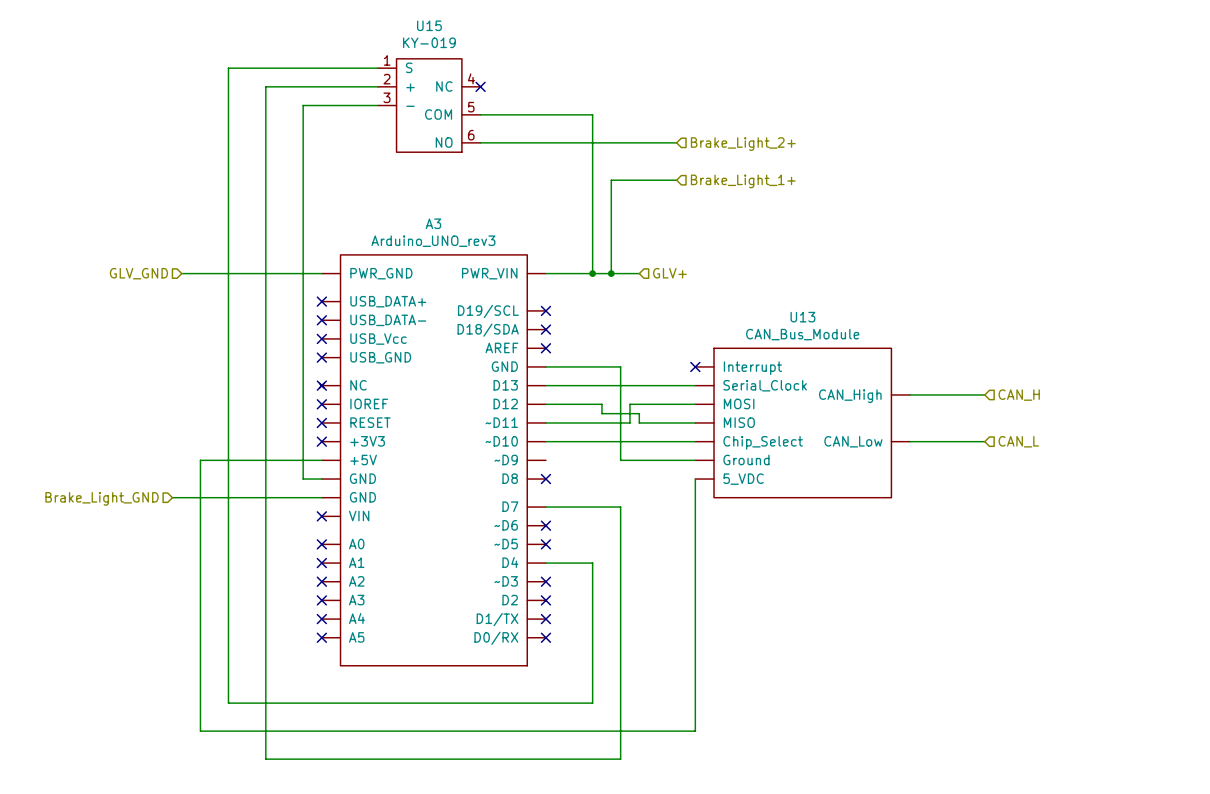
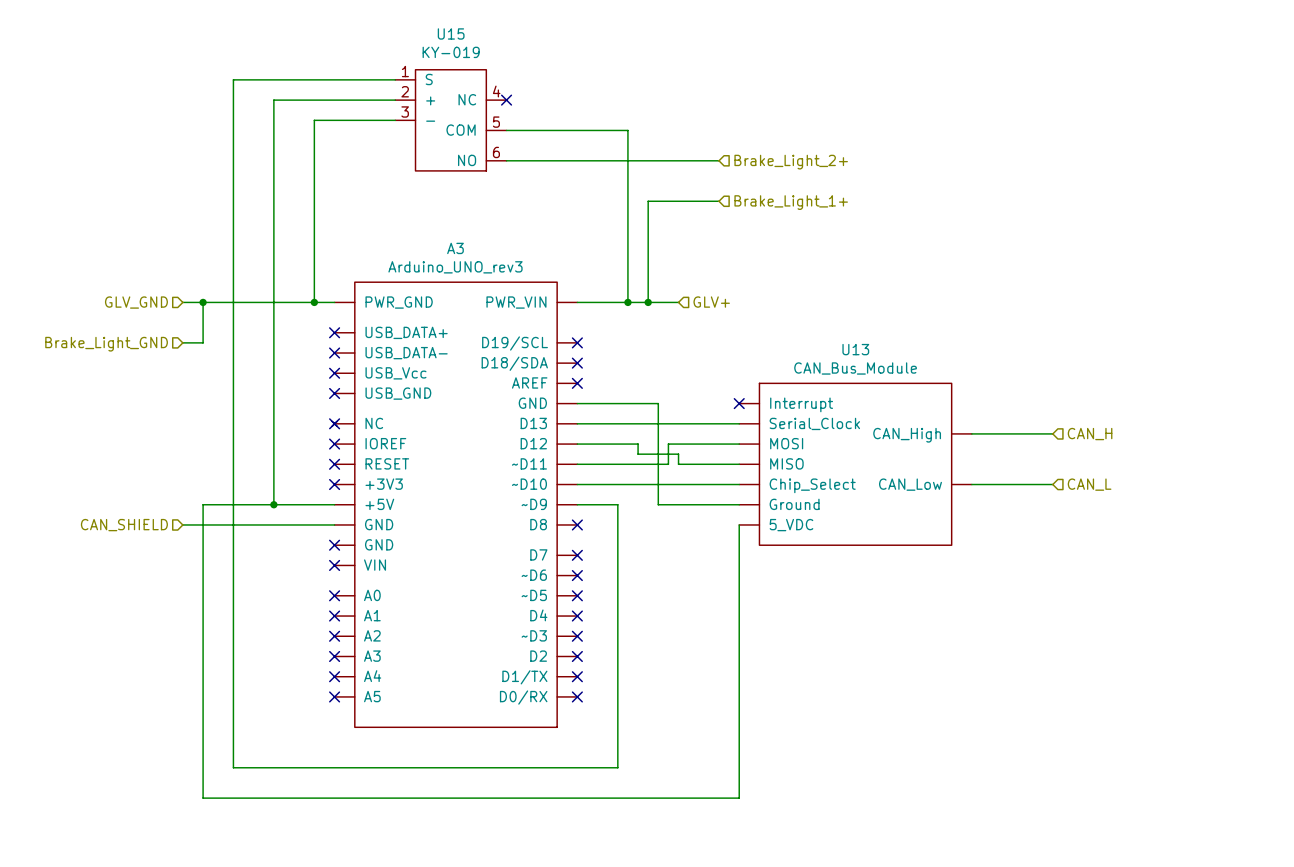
wire: none -> (203, 302) (203, 342) (182, 342)
junction: none -> (203, 302)
wire: (303, 273) (303, 479) -> (182, 524) (314, 524)
junction: none -> (314, 302)
hierarchical label: none -> Brake_Light_GND (106, 344)
wire: (265, 460) (265, 759) (620, 759) (620, 507) (545, 507) -> none
junction: none -> (273, 504)
hierarchical label: none -> CAN_SHIELD (124, 525)
wire: (172, 497) (321, 497) -> none
no-connect mark: none -> (334, 545)
hierarchical label: Brake_Light_GND (102, 498) -> none
no-connect mark: none -> (577, 555)
wire: (545, 563) (592, 563) (592, 703) (583, 703) -> (577, 504) (617, 504) (617, 767)
no-connect mark: none -> (577, 616)

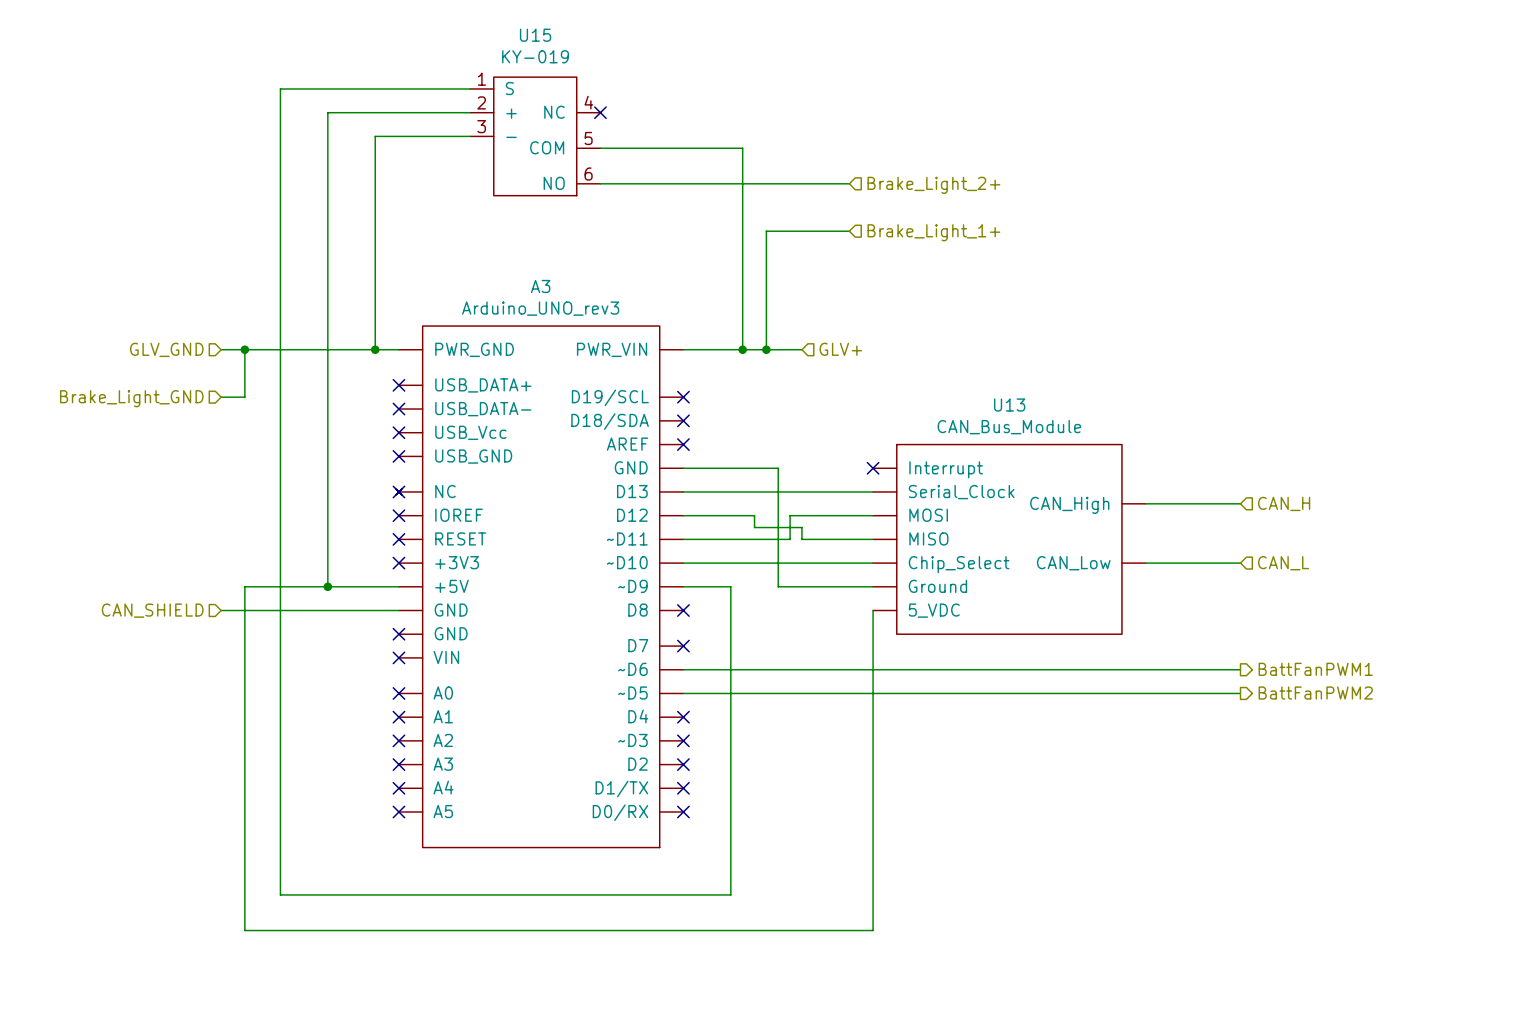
wire: none -> (683, 669) (1240, 669)
no-connect mark: (577, 575) -> none
hierarchical label: none -> BattFanPWM1 (1315, 669)
wire: none -> (683, 693) (1240, 693)
no-connect mark: (577, 595) -> none
hierarchical label: none -> BattFanPWM2 (1315, 693)

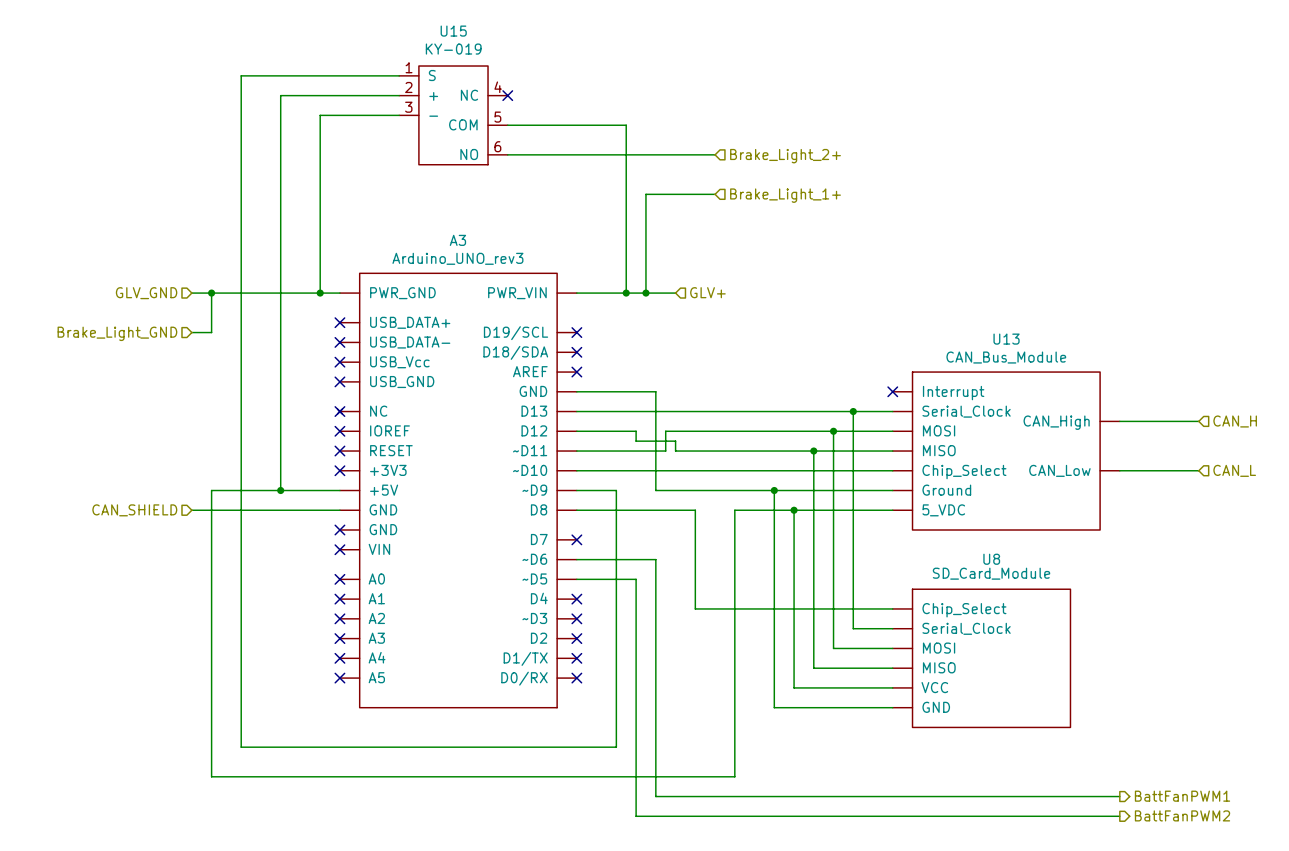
no-connect mark: (873, 468) -> none
no-connect mark: none -> (892, 391)
wire: none -> (734, 411) (892, 411)
wire: none -> (853, 411) (853, 628) (892, 628)
junction: none -> (853, 411)
wire: (1145, 503) (1240, 503) -> (1119, 421) (1198, 421)
hierarchical label position: CAN_H (1284, 503) -> CAN_H (1235, 421)
wire: none -> (734, 431) (892, 431)
wire: none -> (833, 431) (833, 648) (892, 648)
junction: none -> (833, 431)
wire: none -> (734, 451) (892, 451)
wire: none -> (813, 451) (813, 668) (892, 668)
junction: none -> (813, 451)
U13 position: (1009, 539) -> (1006, 451)
wire: none -> (734, 470) (892, 470)
wire: (1145, 563) (1240, 563) -> (1119, 470) (1198, 470)
hierarchical label position: CAN_L (1283, 563) -> CAN_L (1234, 470)
wire: none -> (734, 490) (892, 490)
wire: none -> (774, 490) (774, 707) (892, 707)
junction: none -> (774, 490)
wire: none -> (576, 510) (695, 510) (695, 608) (892, 608)
no-connect mark: (683, 610) -> none
wire: none -> (734, 510) (892, 510)
wire: none -> (794, 510) (794, 687) (892, 687)
junction: none -> (794, 510)
wire: (778, 669) (1240, 669) -> (655, 559) (655, 796) (1119, 796)
hierarchical label: BattFanPWM1 (1315, 669) -> none
wire: (754, 693) (1240, 693) -> (636, 579) (636, 816) (1119, 816)
hierarchical label: BattFanPWM2 (1315, 693) -> none
U8: none -> SD_Card_Module (981, 658)
hierarchical label: none -> BattFanPWM1 (1182, 796)
hierarchical label: none -> BattFanPWM2 (1182, 815)

